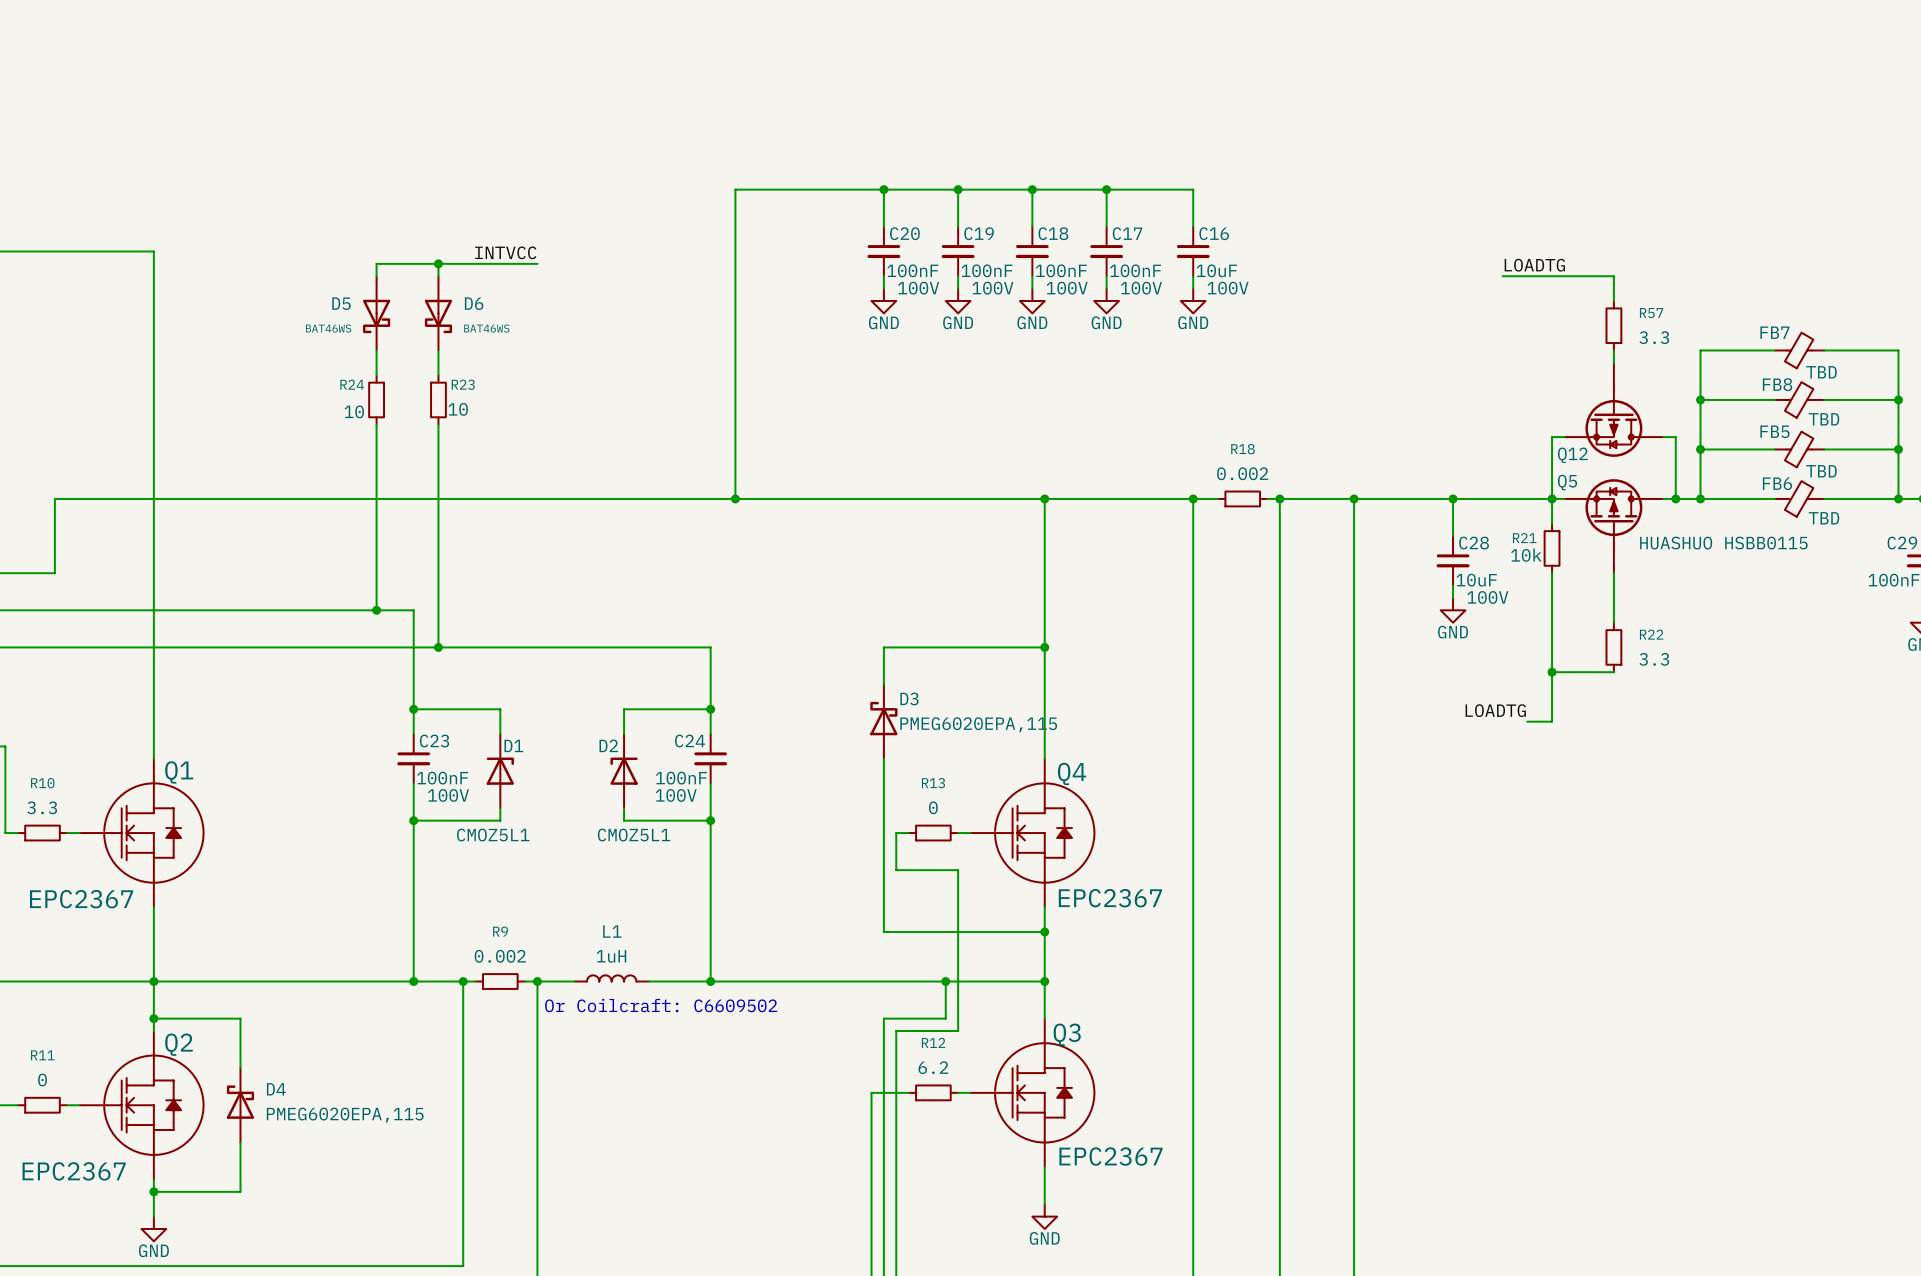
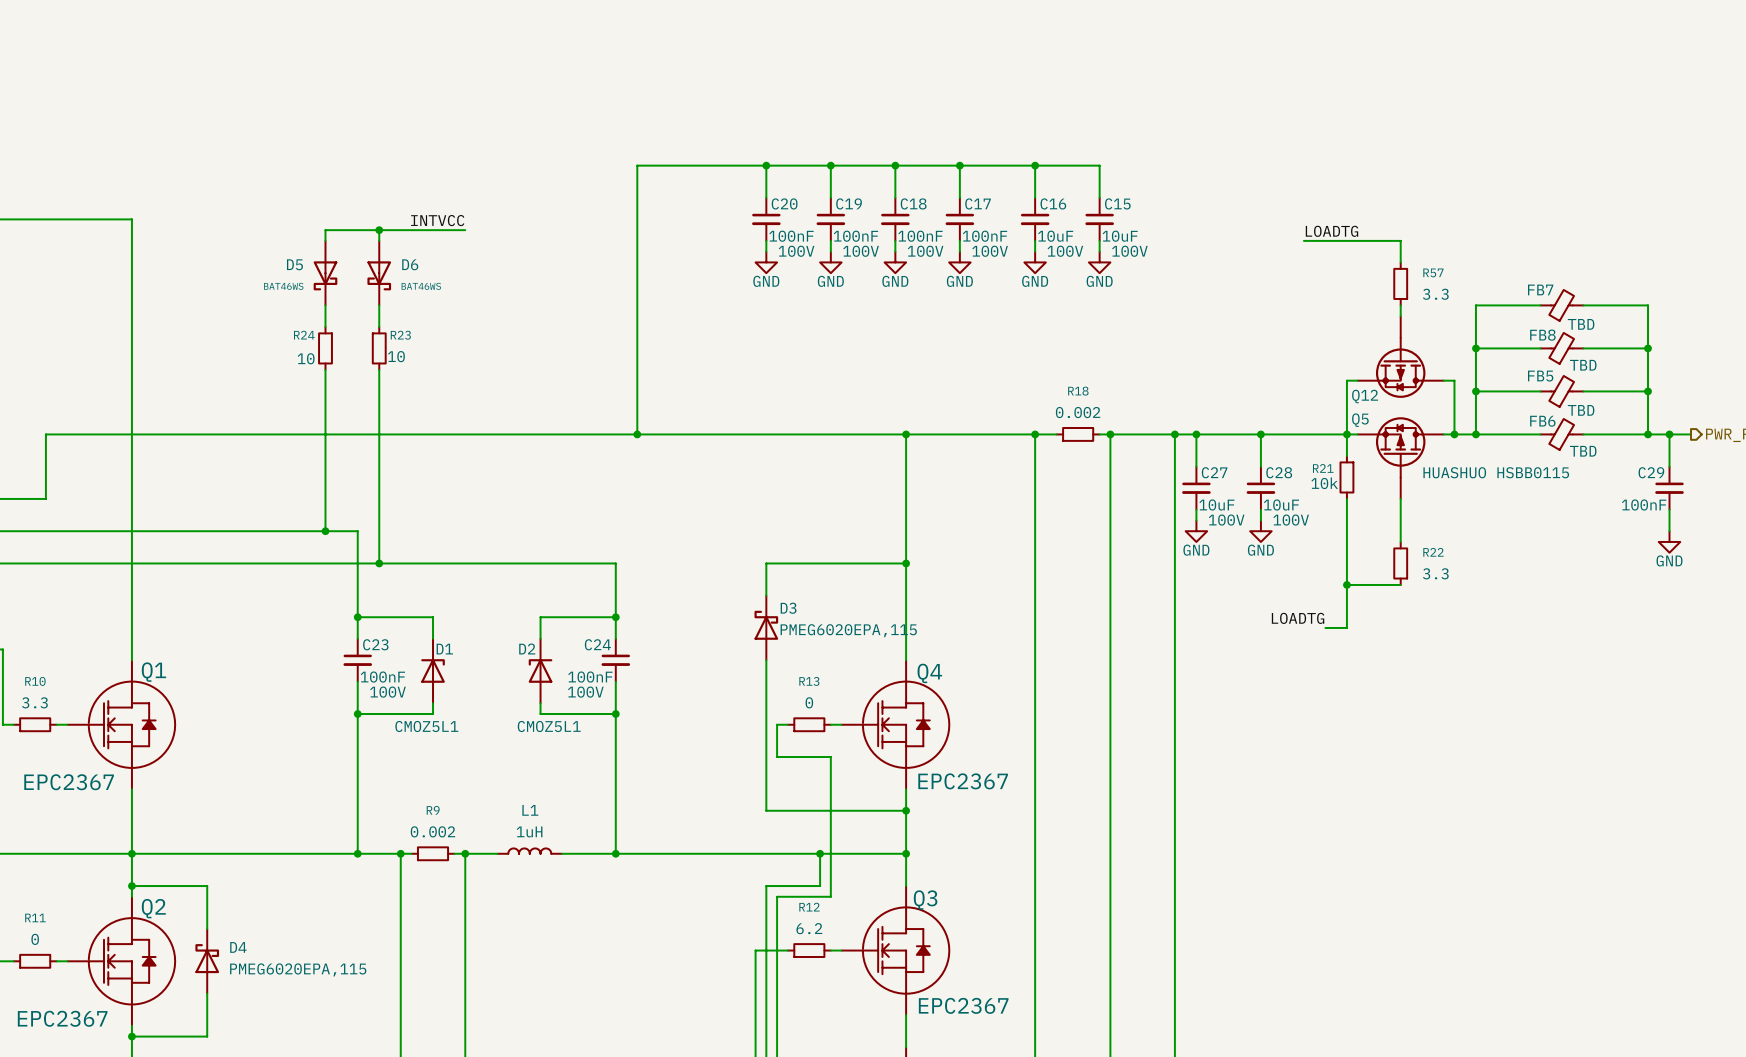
wire: none -> (1035, 165) (1099, 165) (1099, 197)
junction: none -> (1035, 165)
C15: none -> 10uF (1099, 219)
wire: none -> (1099, 240) (1099, 251)
power symbol: none -> GND (1099, 262)
wire: none -> (1196, 434) (1196, 466)
junction: none -> (1196, 434)
C27: none -> 10uF (1196, 488)
wire: none -> (1196, 509) (1196, 520)
power symbol: none -> GND (1196, 531)
text: Or Coilcraft: C6609502 (661, 1005) -> none

